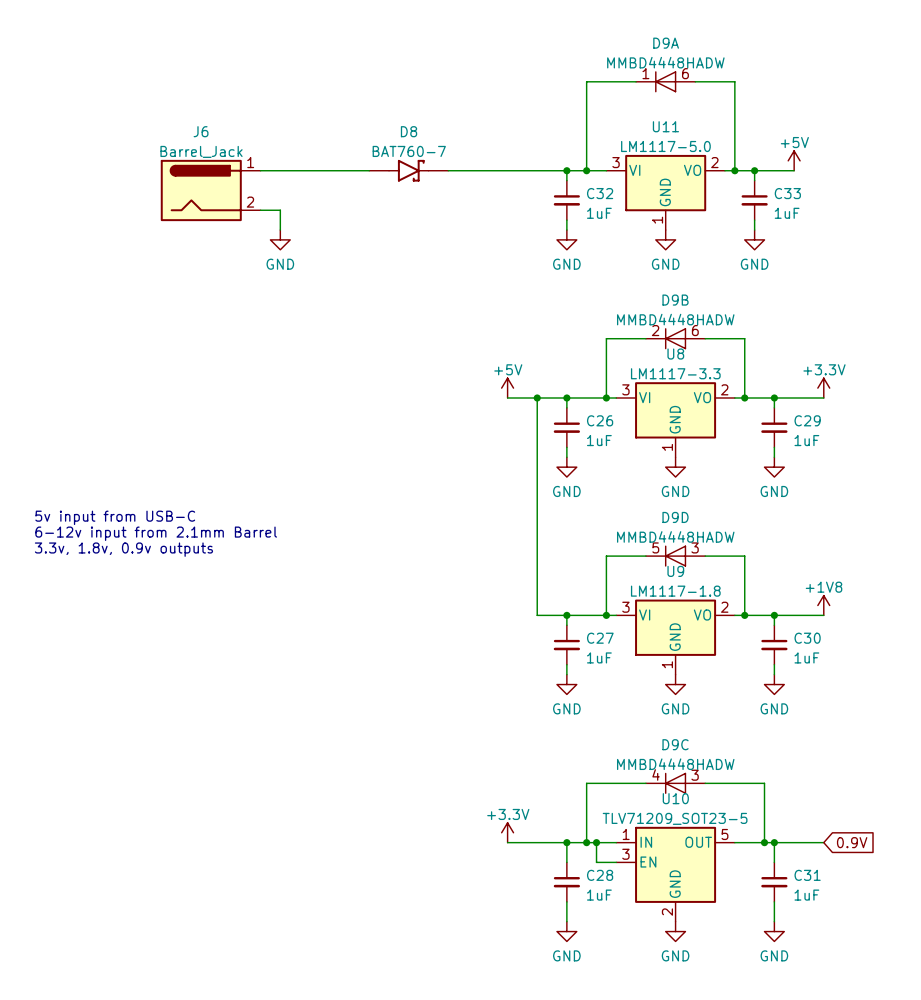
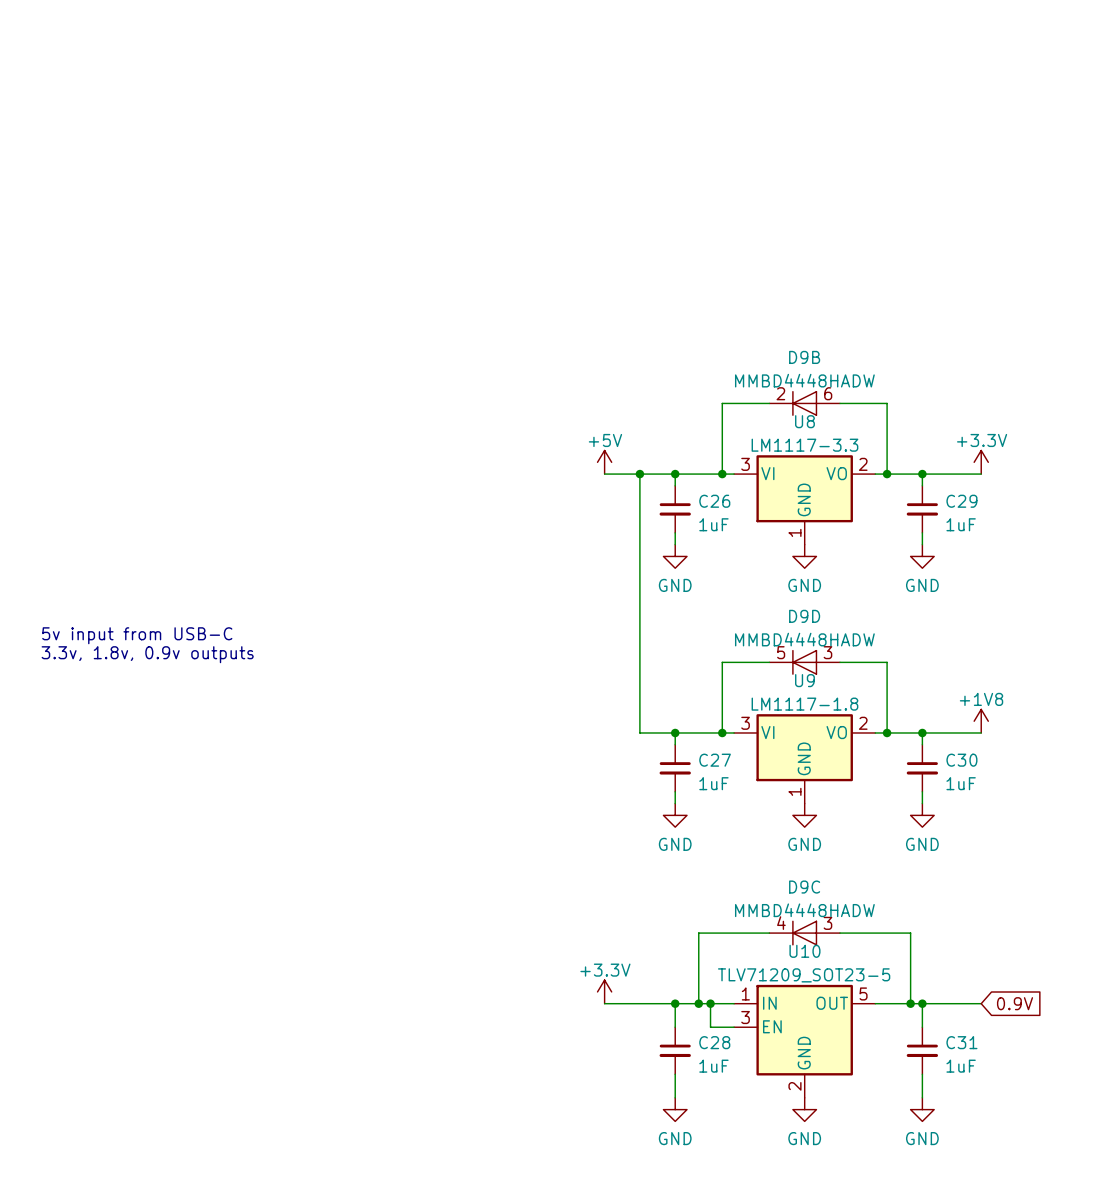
wire: (636, 81) (586, 81) (586, 170) -> none
D9A: MMBD4448HADW (665, 81) -> none
wire: (695, 81) (734, 81) (734, 170) -> none
power symbol: +5V (794, 160) -> none
wire: (260, 170) (369, 170) -> none
D8: BAT760-7 (408, 170) -> none
wire: (448, 170) (606, 170) -> none
wire: (566, 170) (566, 180) -> none
junction: (566, 170) -> none
junction: (586, 170) -> none
wire: (724, 170) (794, 170) -> none
junction: (734, 170) -> none
wire: (754, 170) (754, 180) -> none
junction: (754, 170) -> none
J6: Barrel_Jack (210, 190) -> none
U11: LM1117-5.0 (665, 192) -> none
C32: 1uF (566, 200) -> none
C33: 1uF (754, 200) -> none
wire: (260, 210) (280, 210) (280, 230) -> none
wire: (566, 220) (566, 230) -> none
wire: (754, 220) (754, 230) -> none
power symbol: GND (280, 239) -> none
power symbol: GND (566, 239) -> none
power symbol: GND (665, 239) -> none
power symbol: GND (754, 239) -> none
text: 5v input from USB-C (115, 517) -> none
text: 6-12v input from 2.1mm Barrel (156, 533) -> 5v input from USB-C (137, 635)

